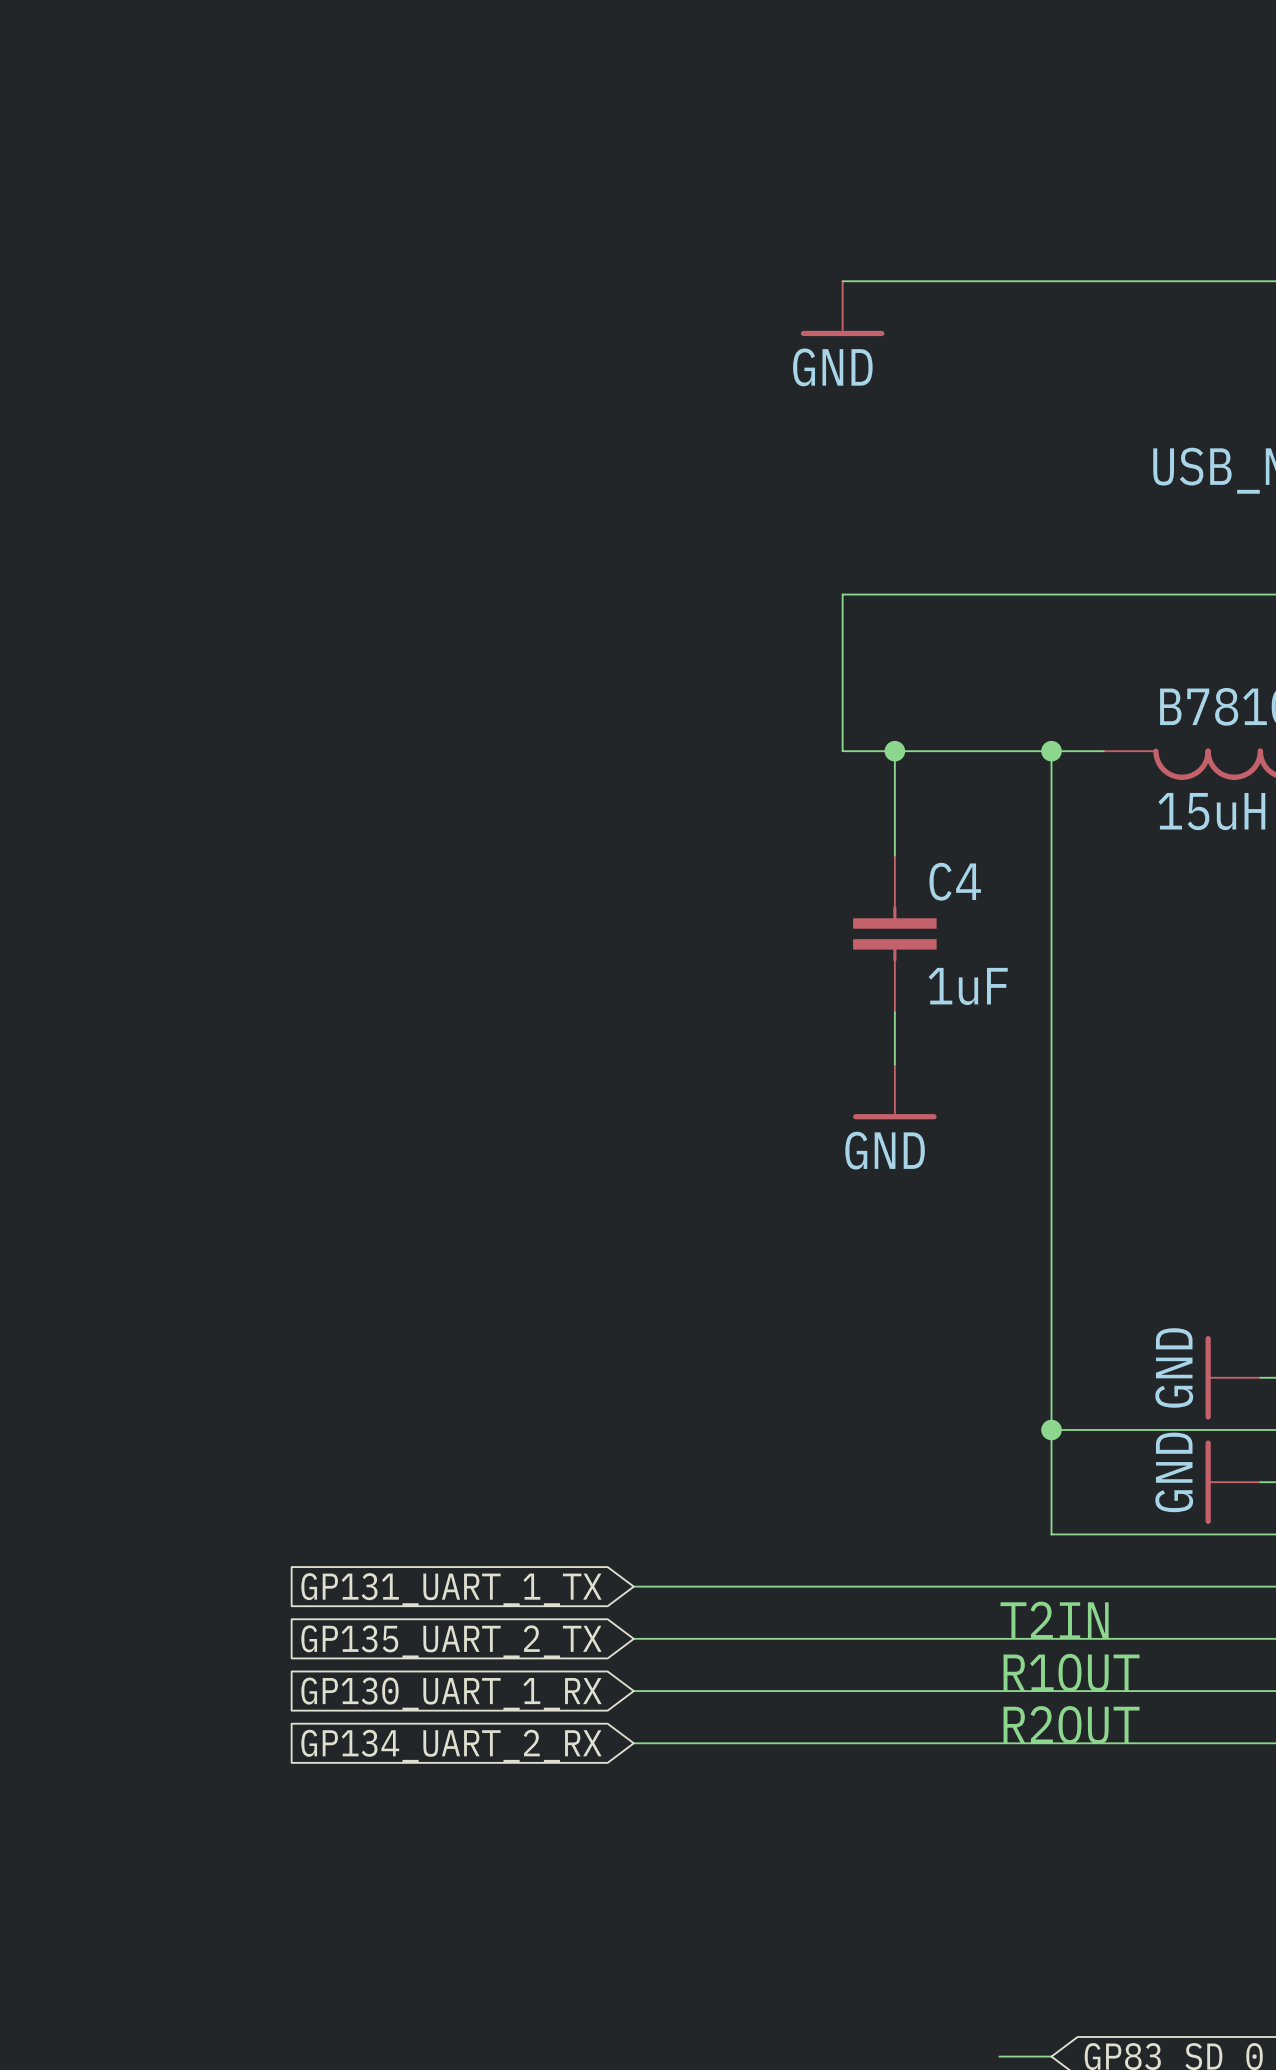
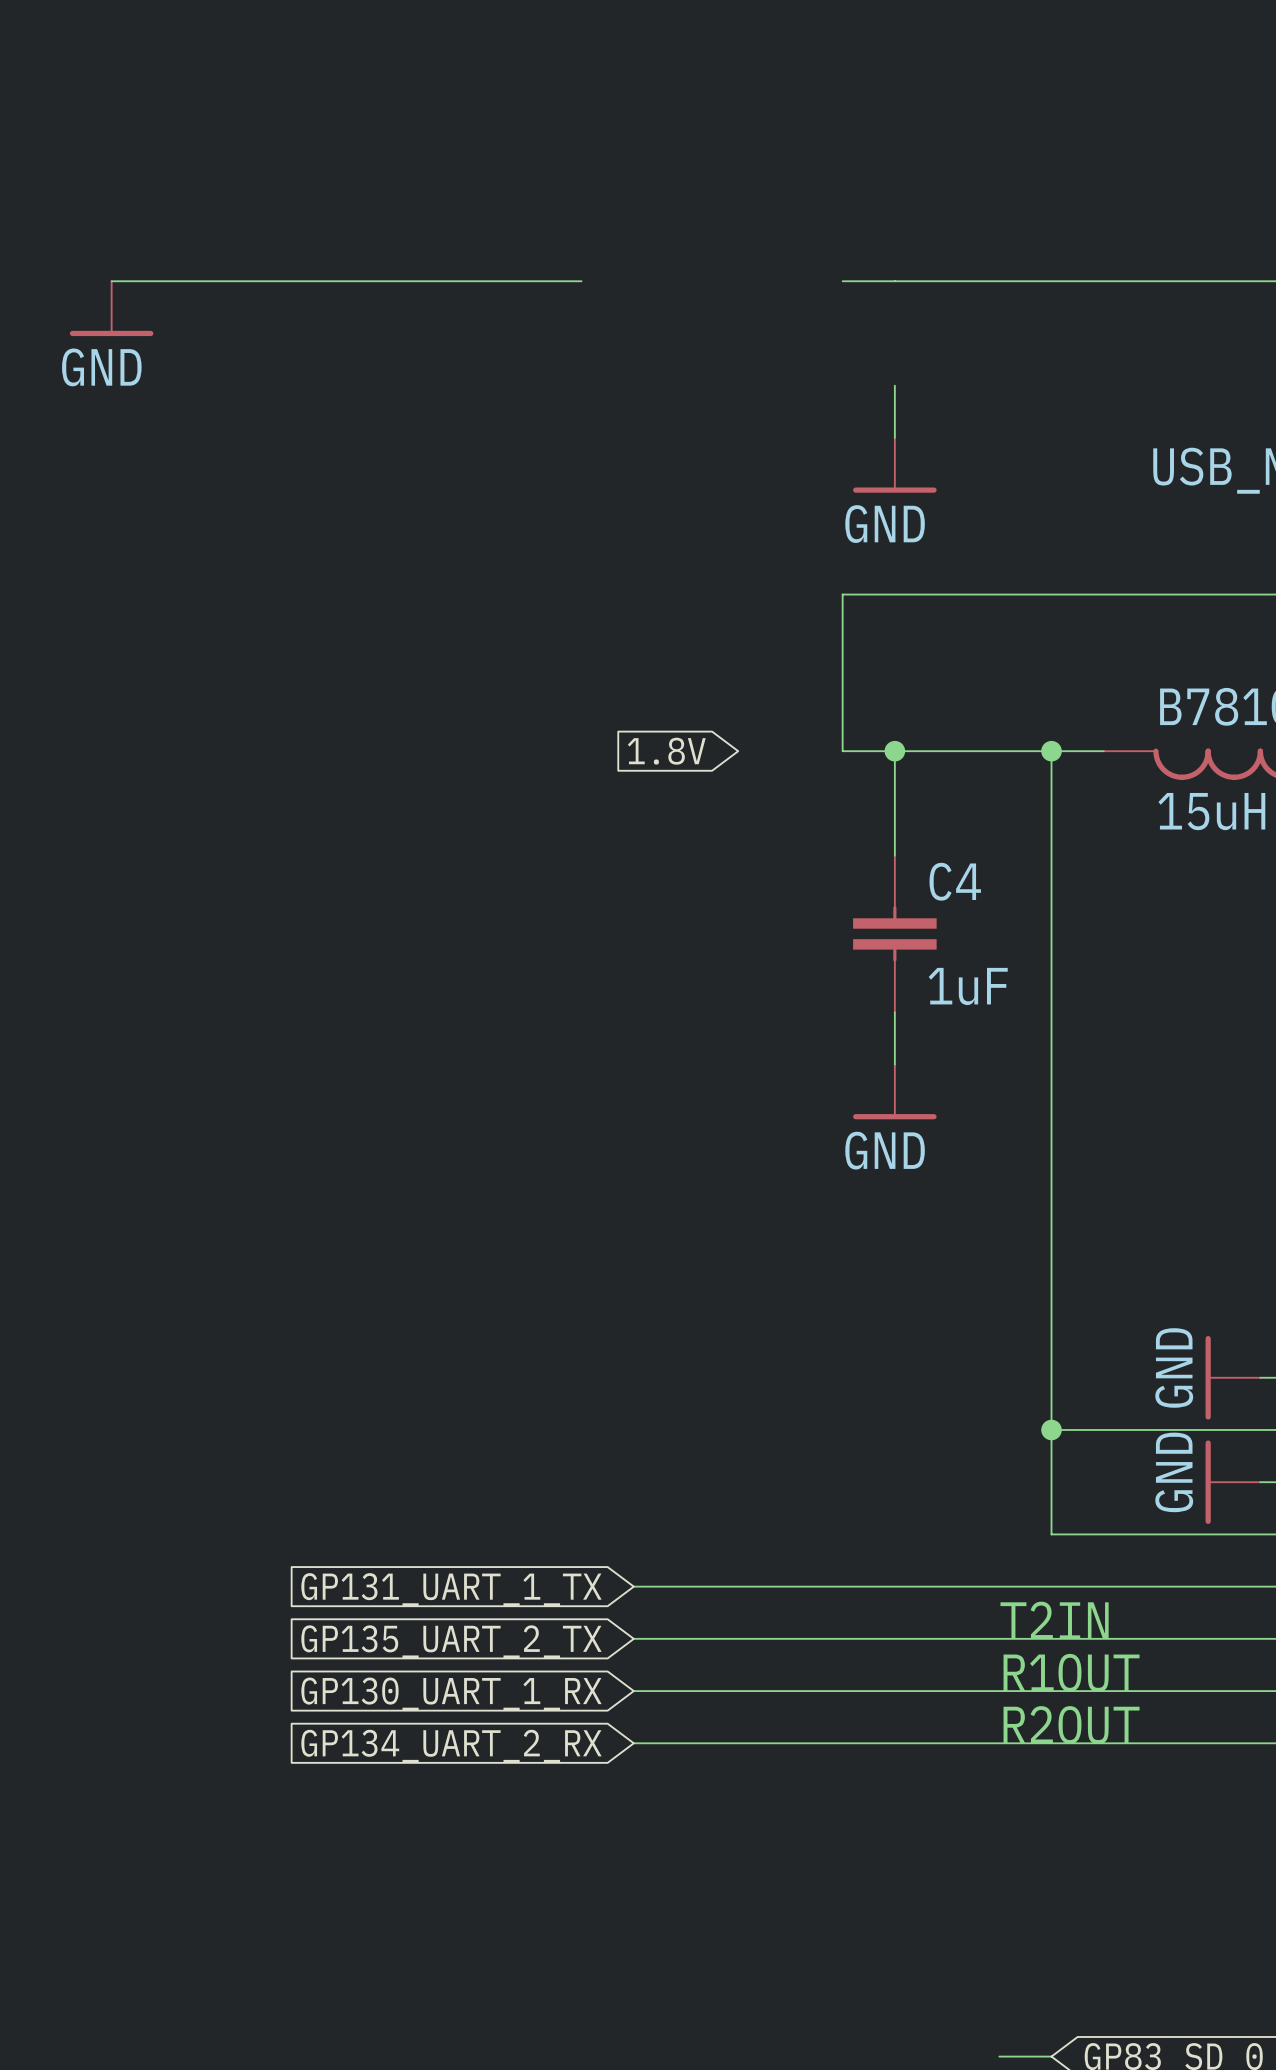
wire: none -> (111, 281) (581, 281)
power symbol: none -> GND (111, 308)
power symbol position: GND (842, 308) -> GND (894, 465)
wire: none -> (894, 385) (894, 437)
global label: none -> 1.8V (666, 751)

